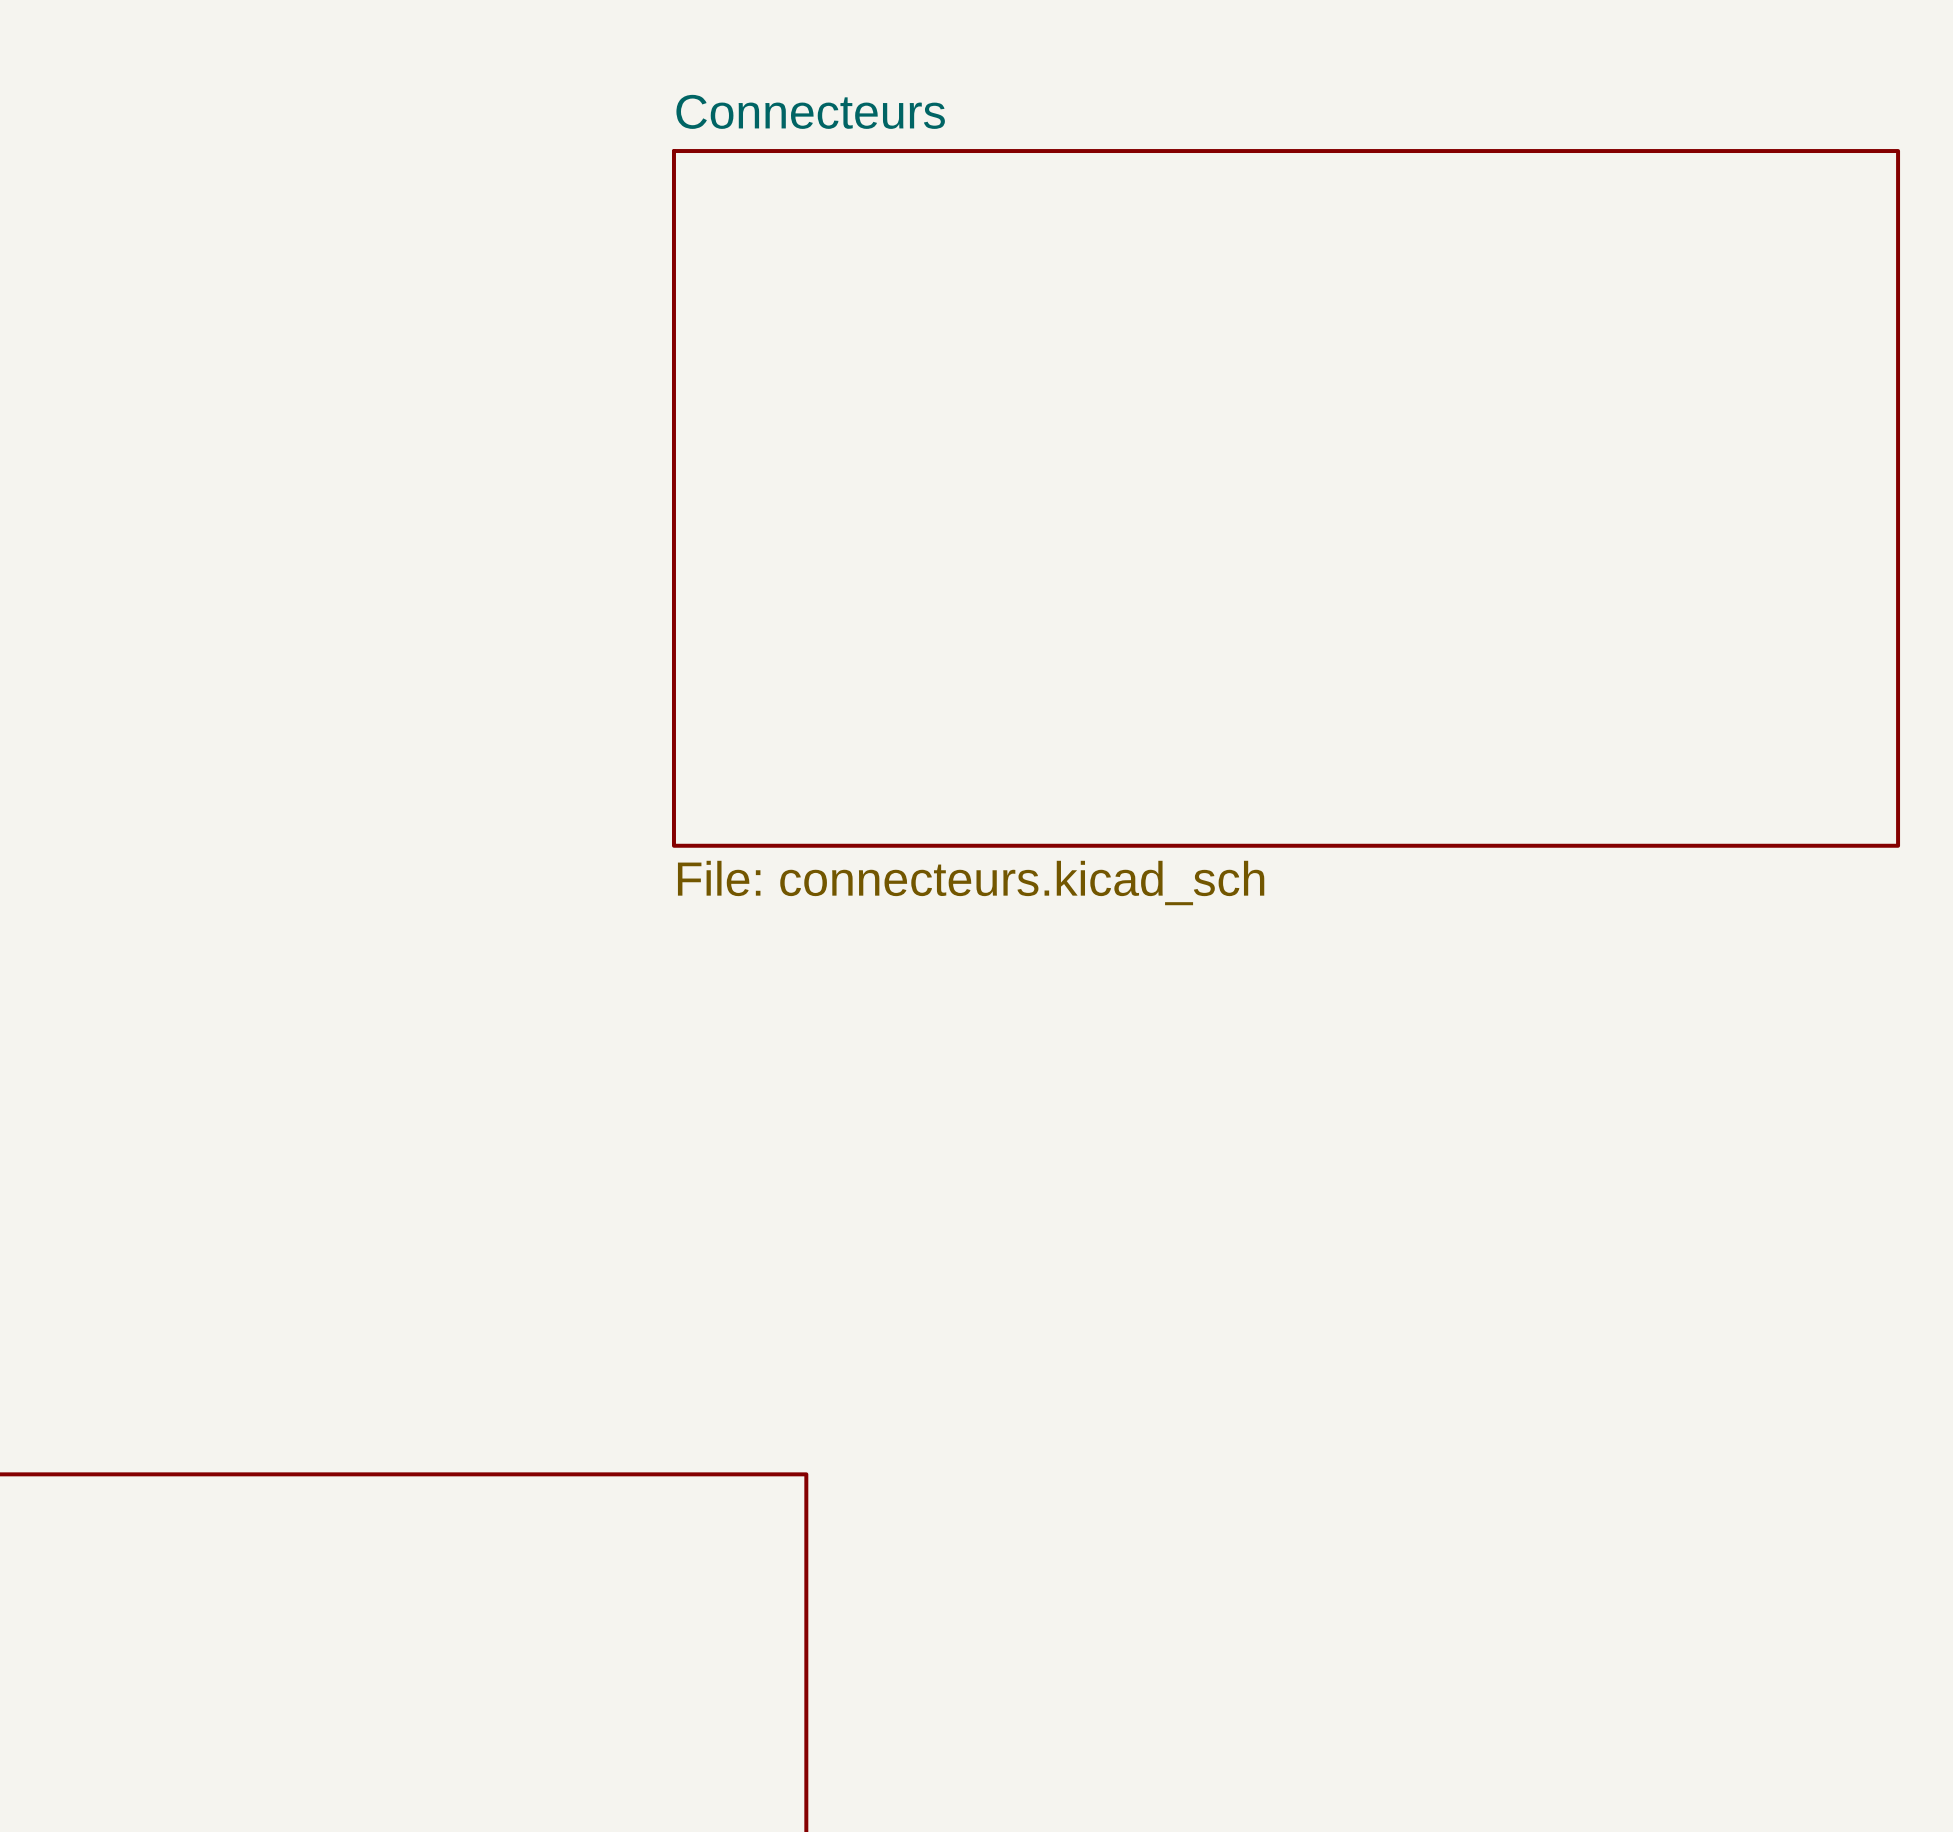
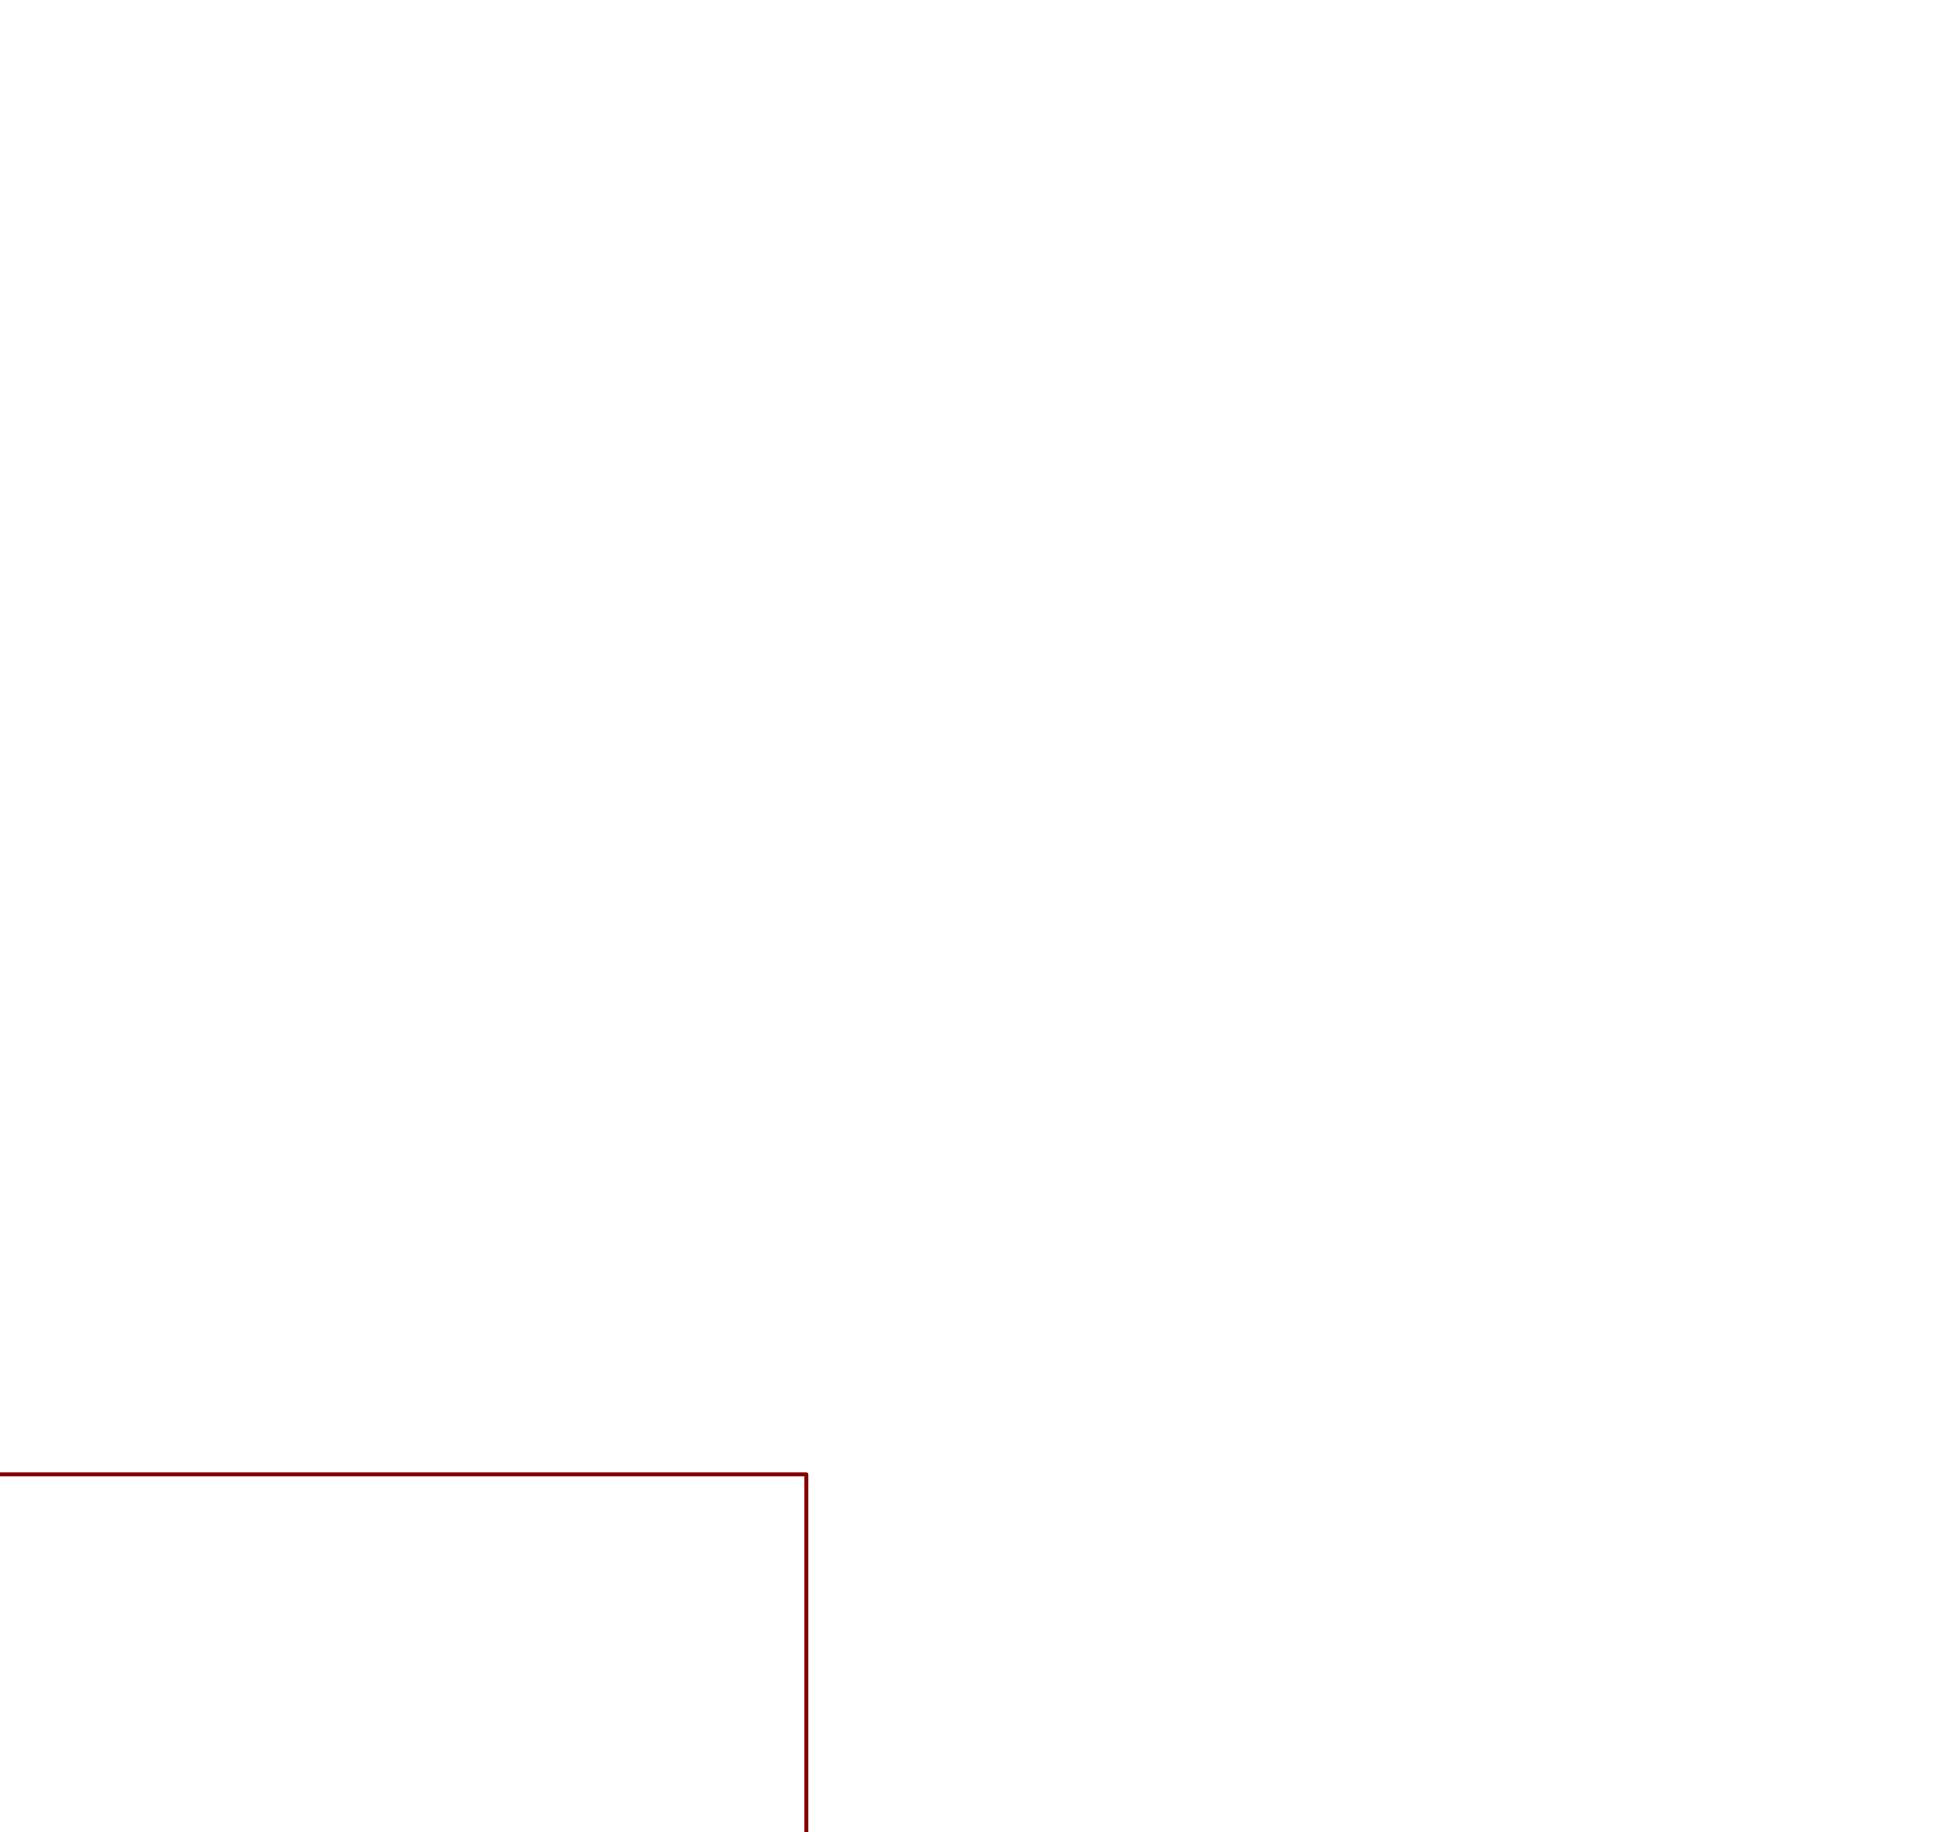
sheet Connecteurs: File: connecteurs.kicad_sch (1286, 498) -> none

